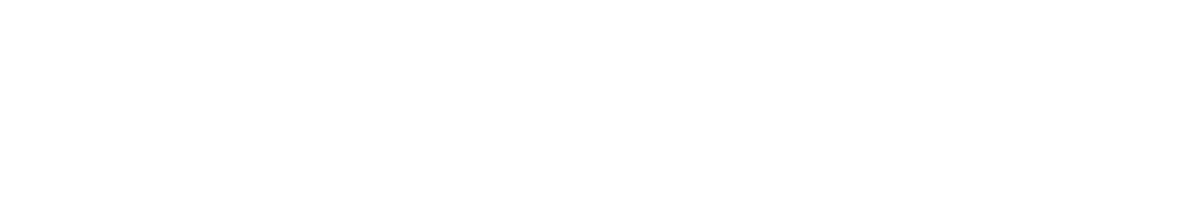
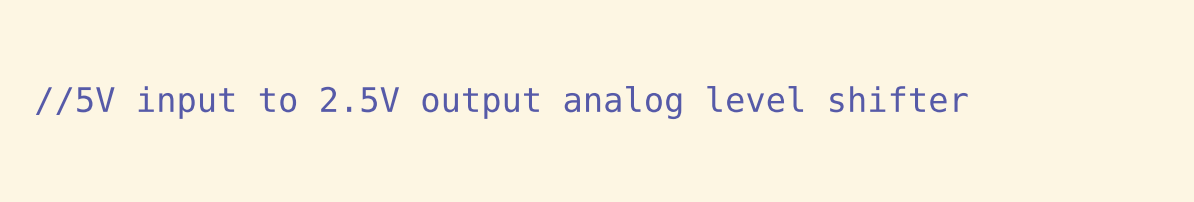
text: none -> //5V input to 2.5V output analog level shifter (501, 102)

